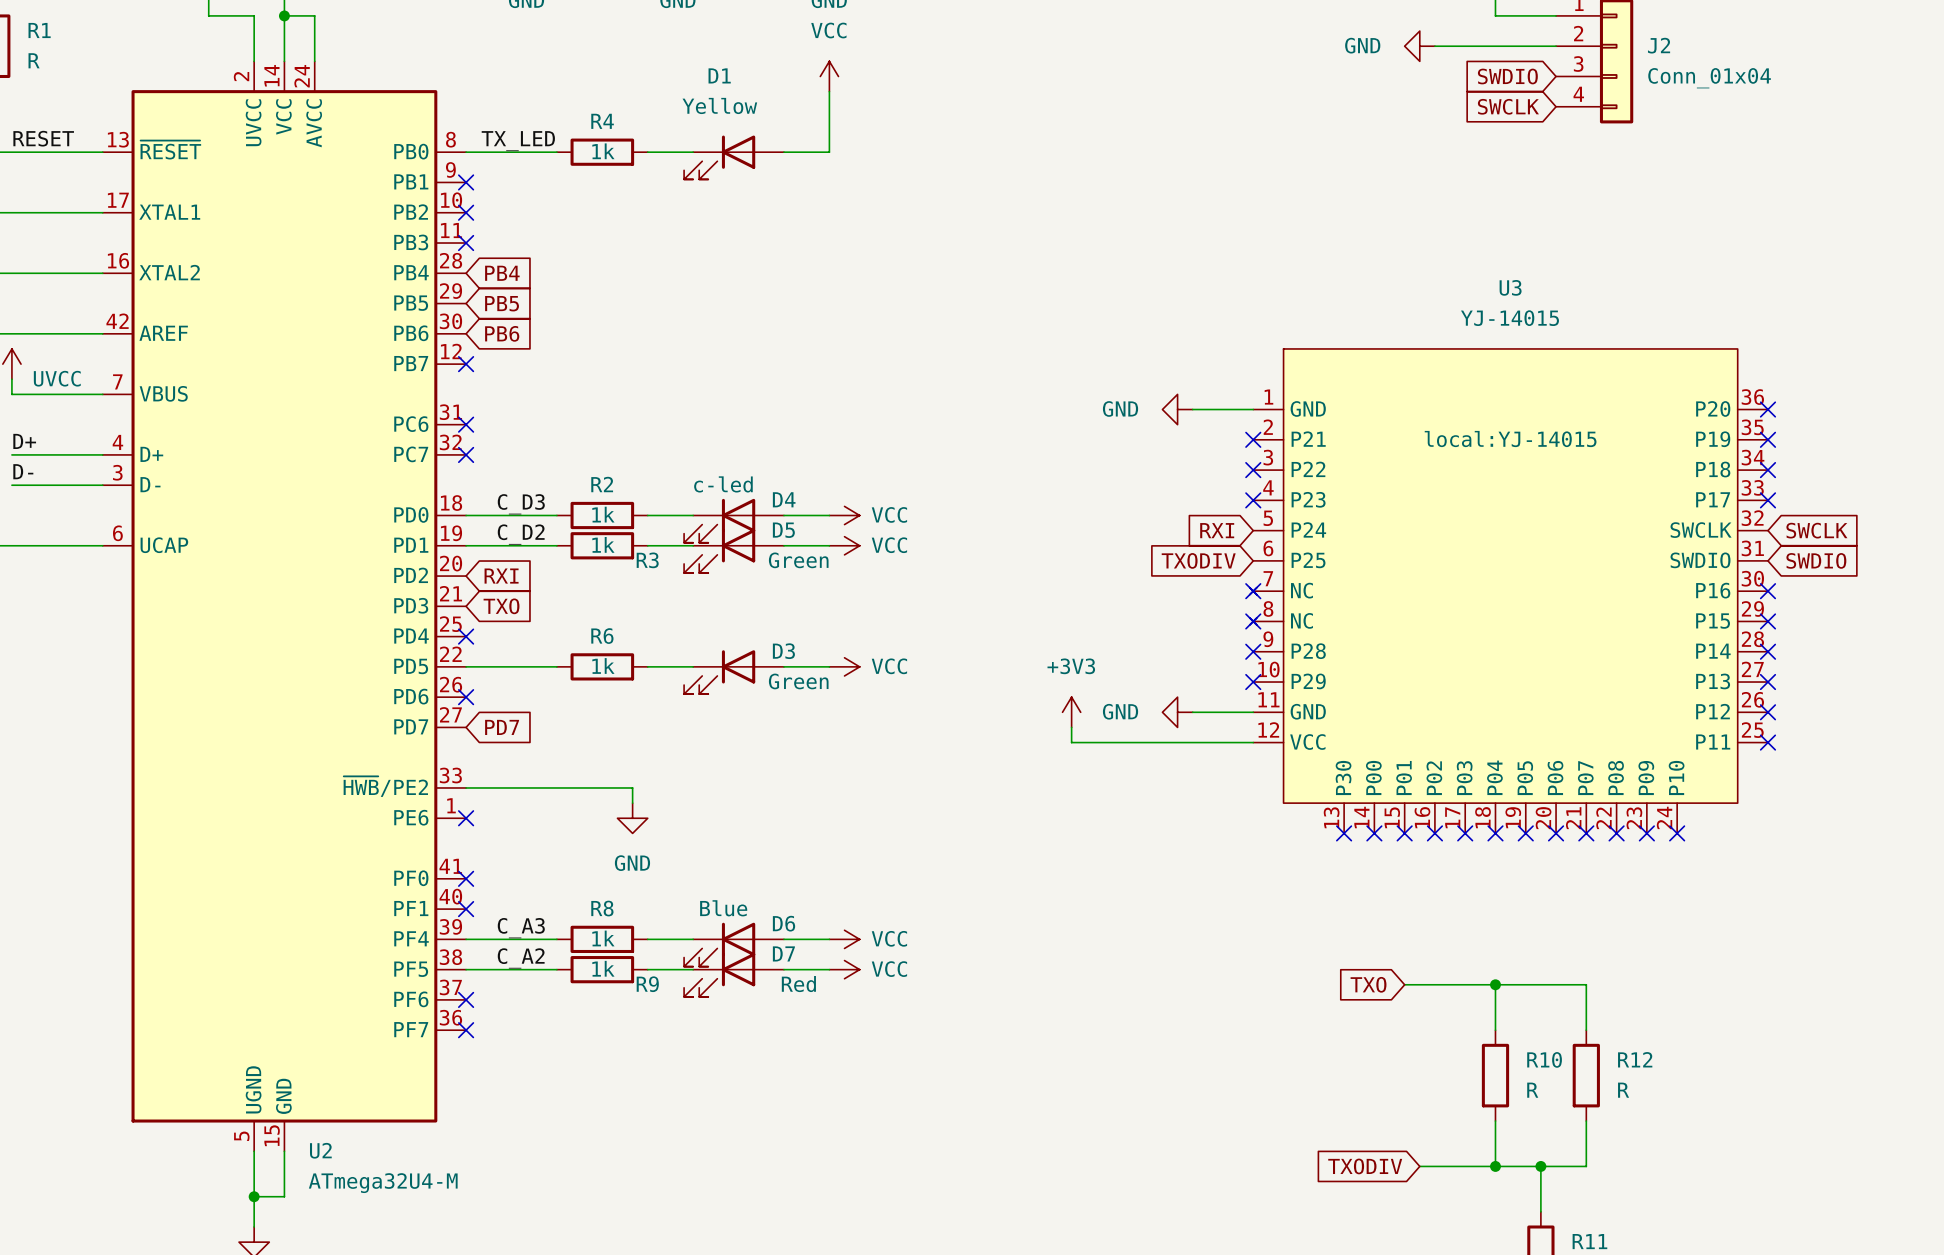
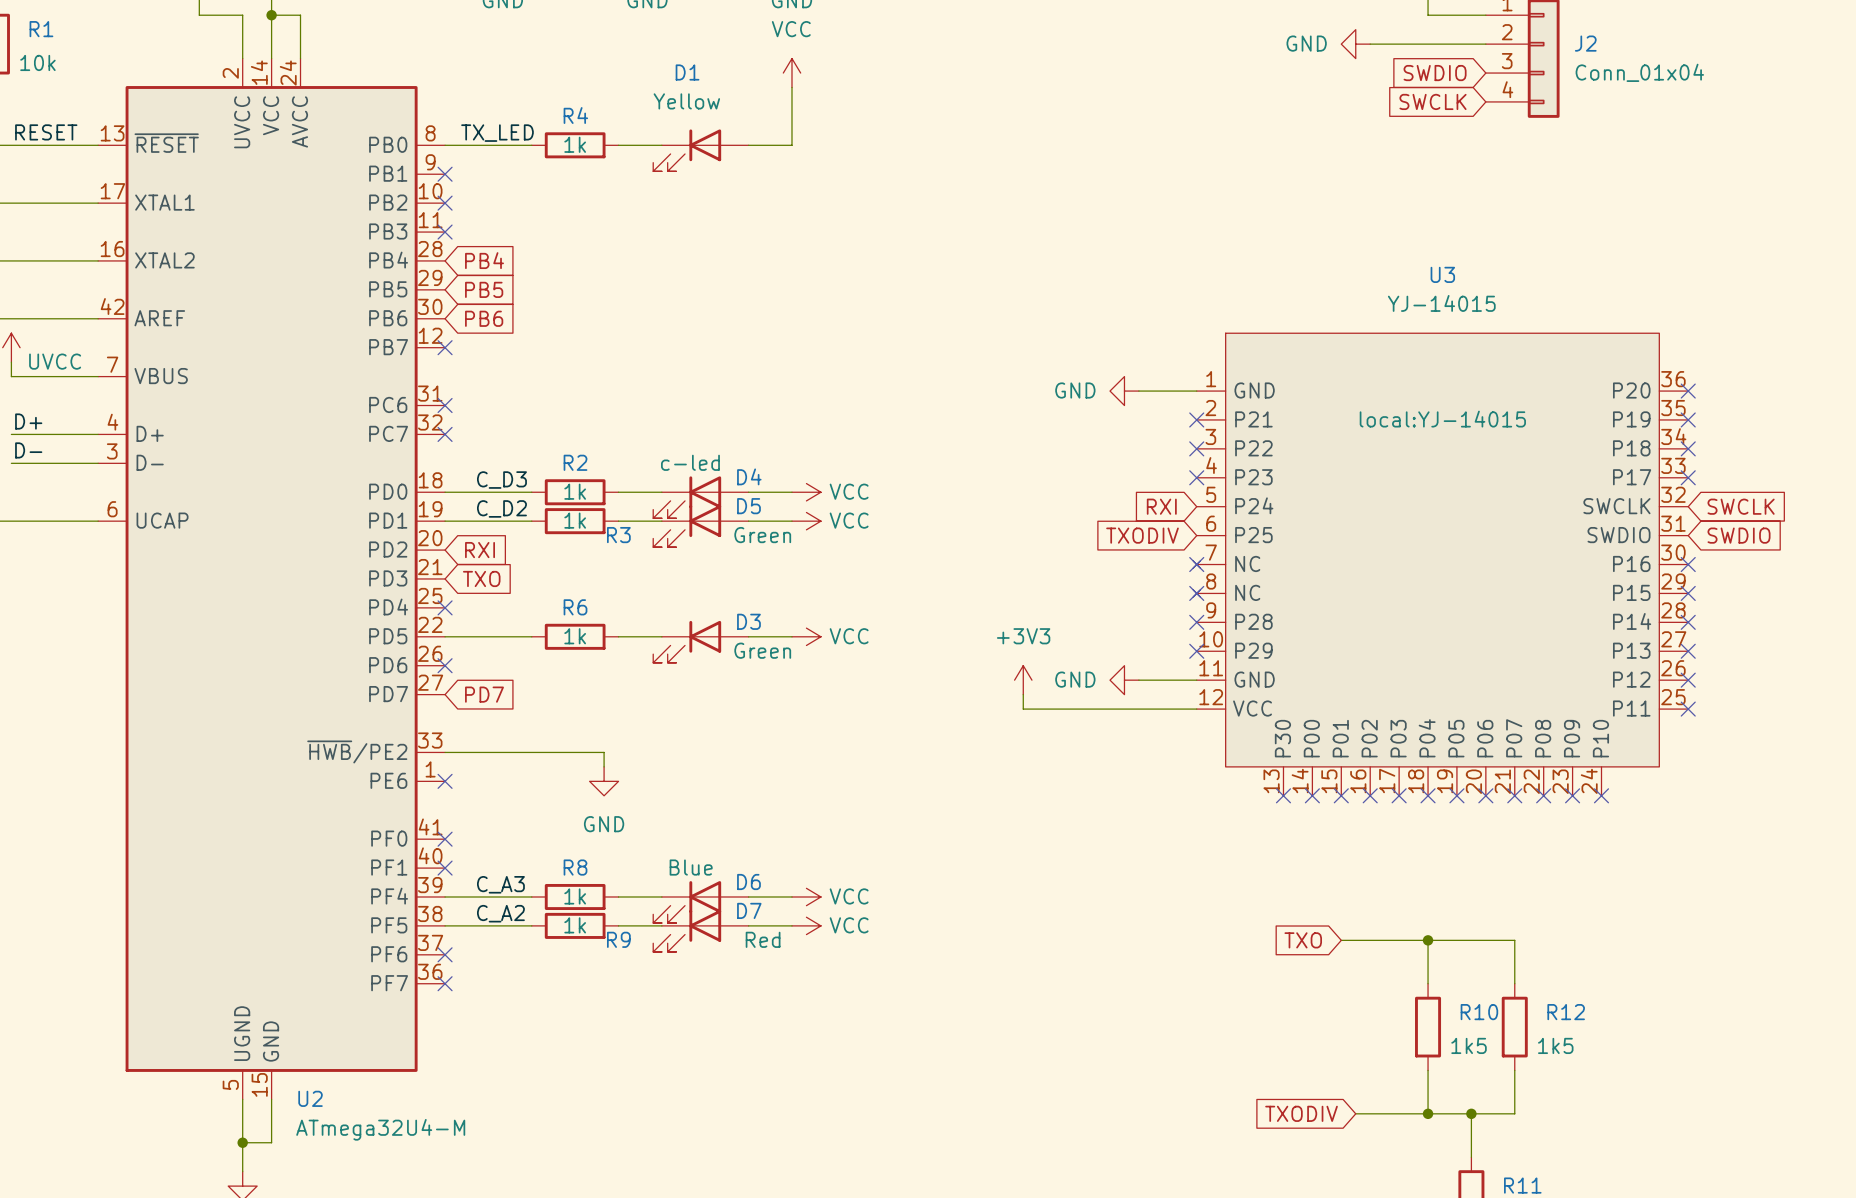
R1 value: R (34, 60) -> 10k (37, 62)
R10 value: R (1532, 1090) -> 1k5 (1469, 1045)
R12 value: R (1623, 1090) -> 1k5 (1555, 1045)

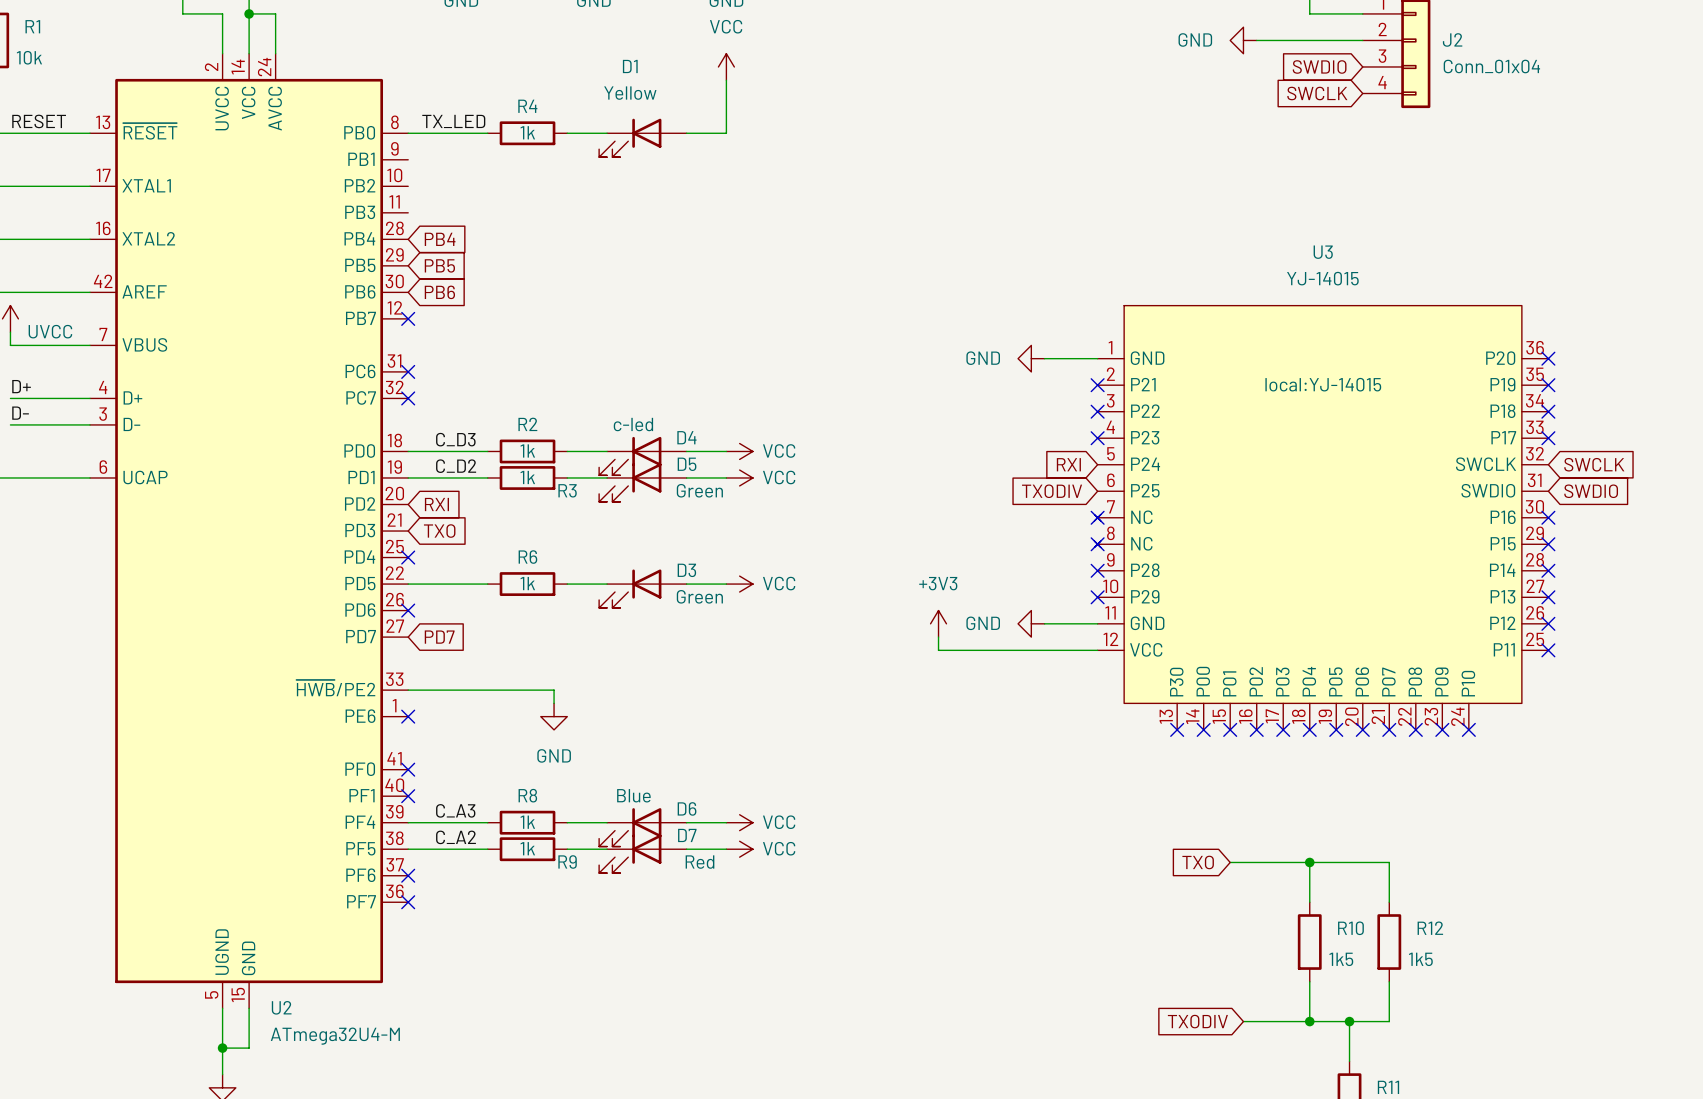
no-connect mark: (445, 174) -> none
no-connect mark: (445, 203) -> none
no-connect mark: (445, 232) -> none

